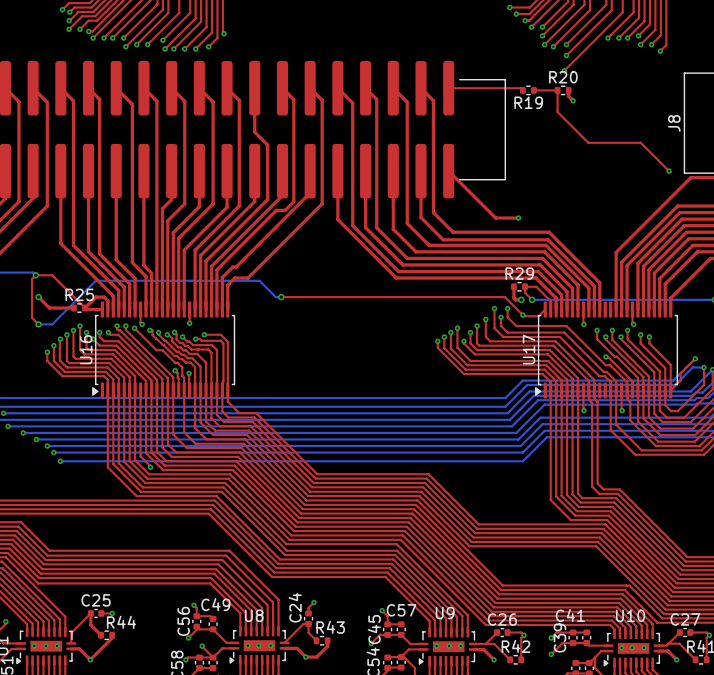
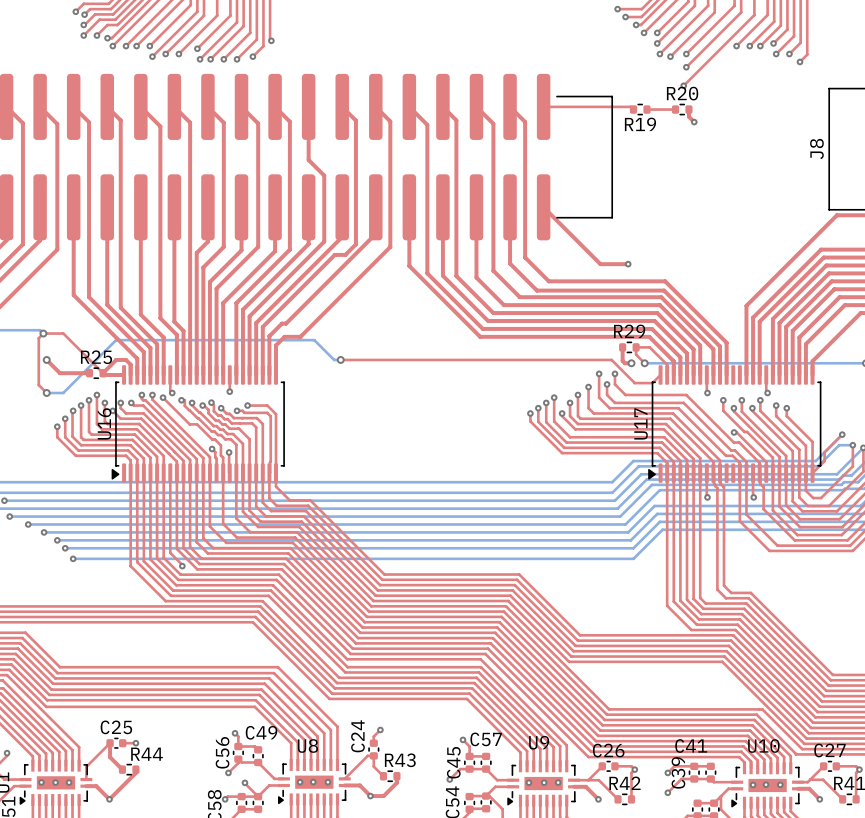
top track: (557, 90) (557, 112) (588, 142) (640, 142) (669, 171) -> none
via: (669, 171) -> none
via: (522, 315) -> none

